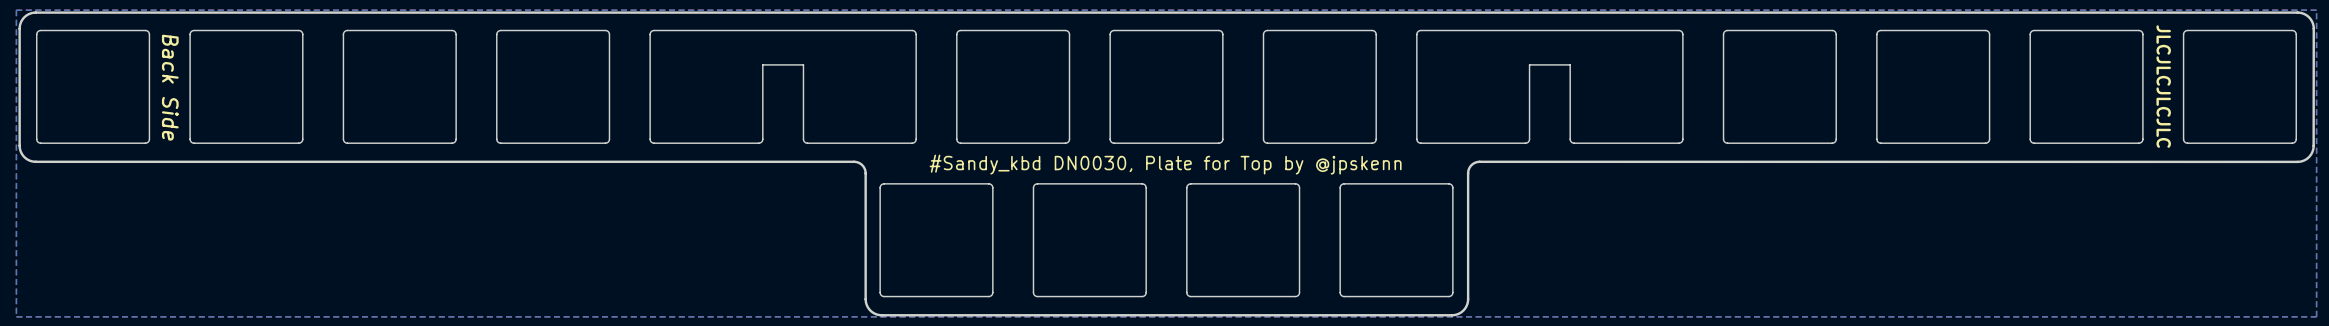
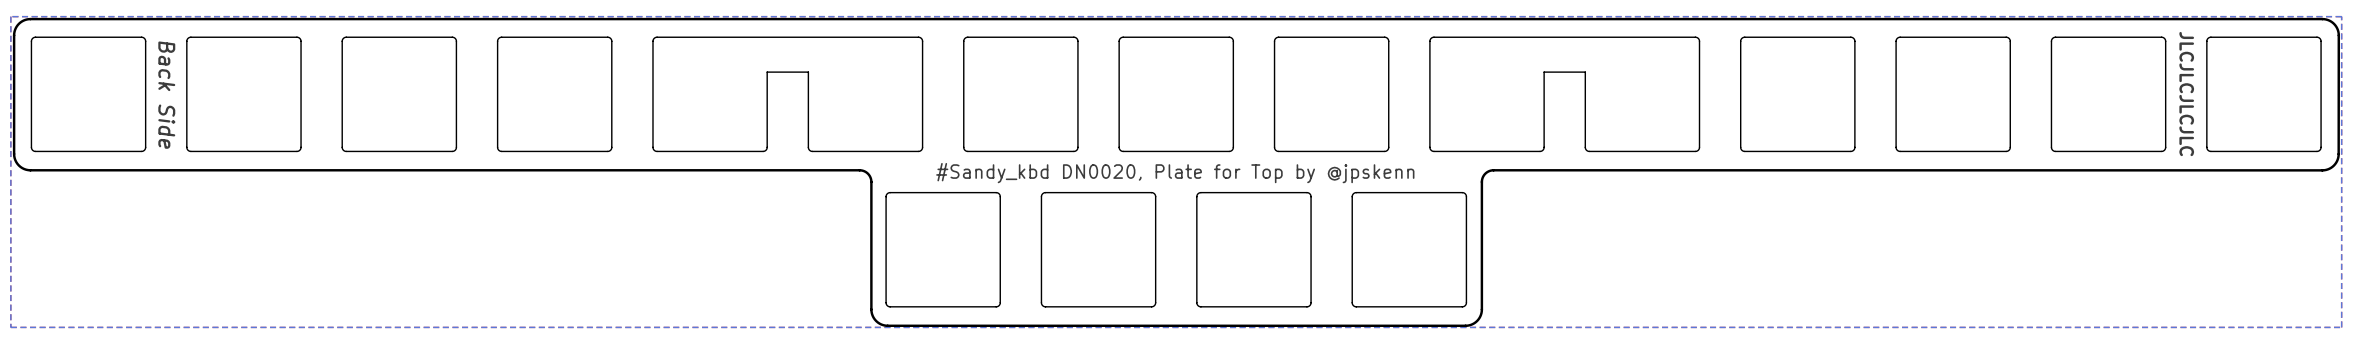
text: #Sandy_kbd DN0030, Plate for Top by @jpskenn (1165, 164) -> #Sandy_kbd DN0020, Plate for Top by @jpskenn (1175, 173)

